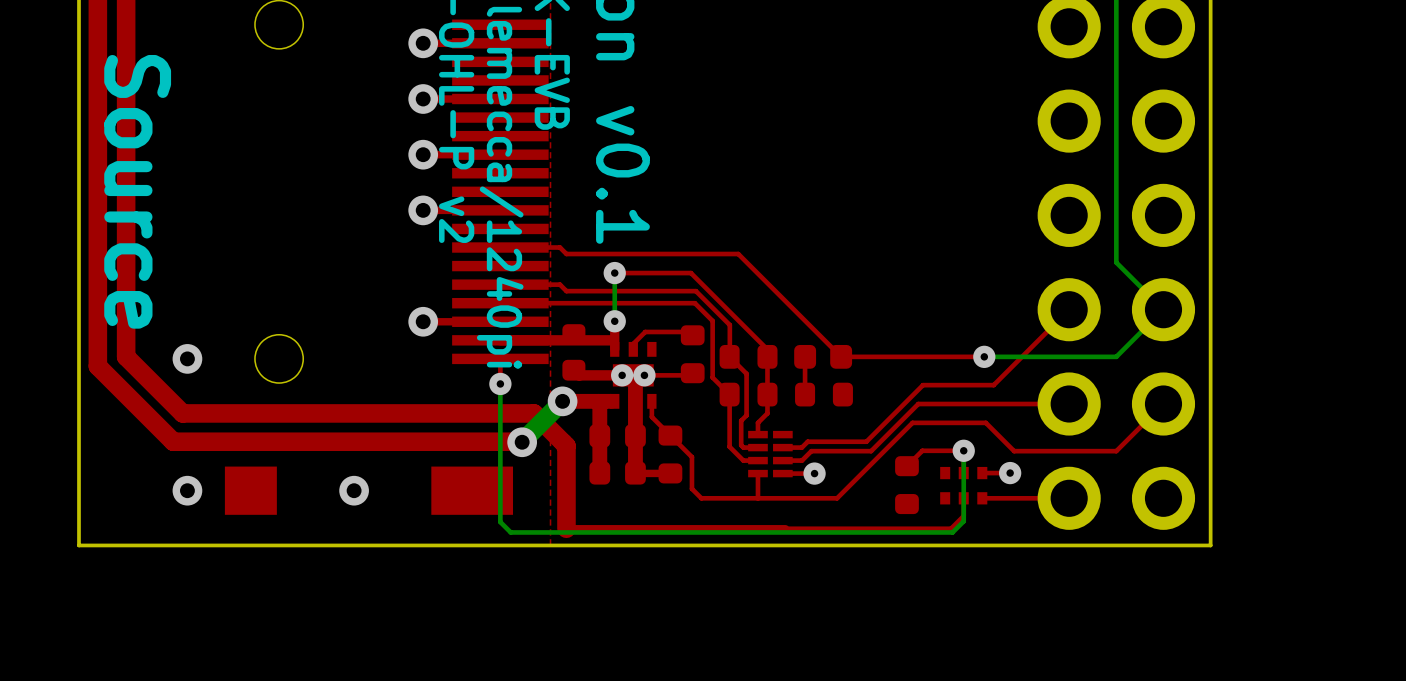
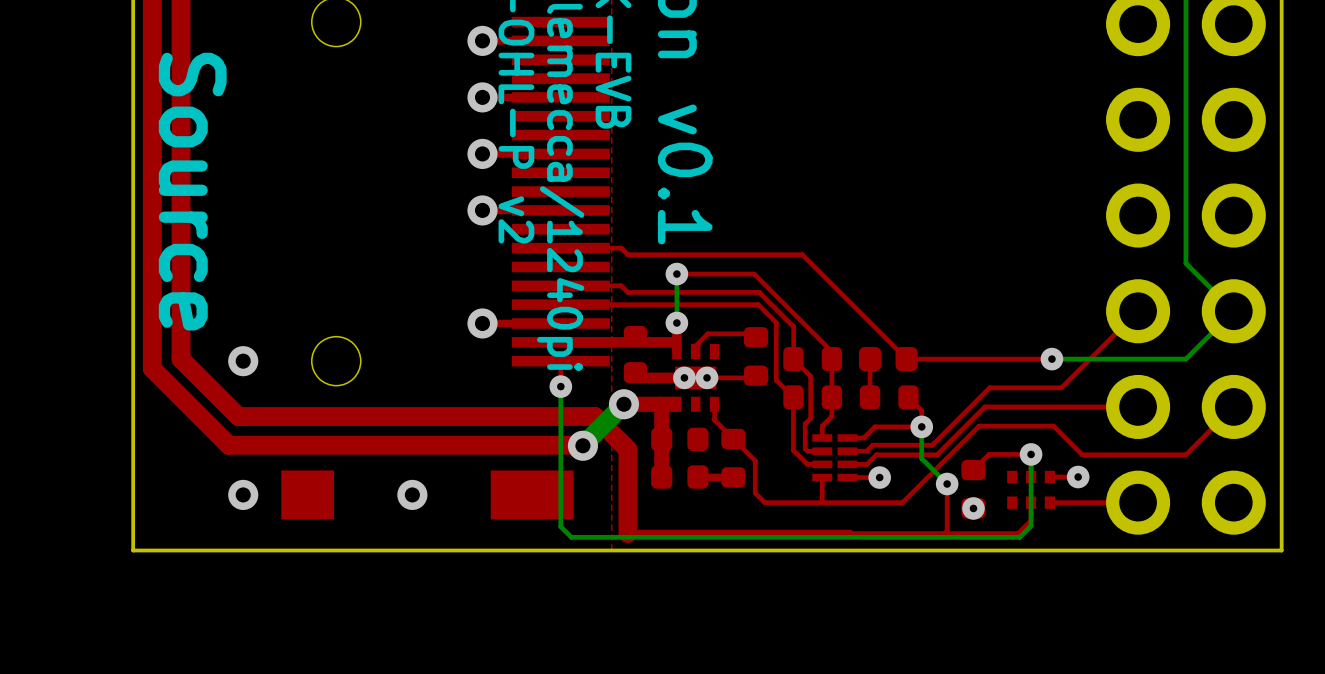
top track: (644, 375) (635, 384) (635, 473) -> none
top track: none -> (908, 397) (921, 410) (921, 426) (875, 426) (863, 437) (847, 437)
bottom track: none -> (921, 426) (921, 458) (947, 483)
via: none -> (921, 426)
top track: none -> (947, 483) (947, 530) (944, 533)
via: none -> (947, 483)
via: none -> (973, 508)

